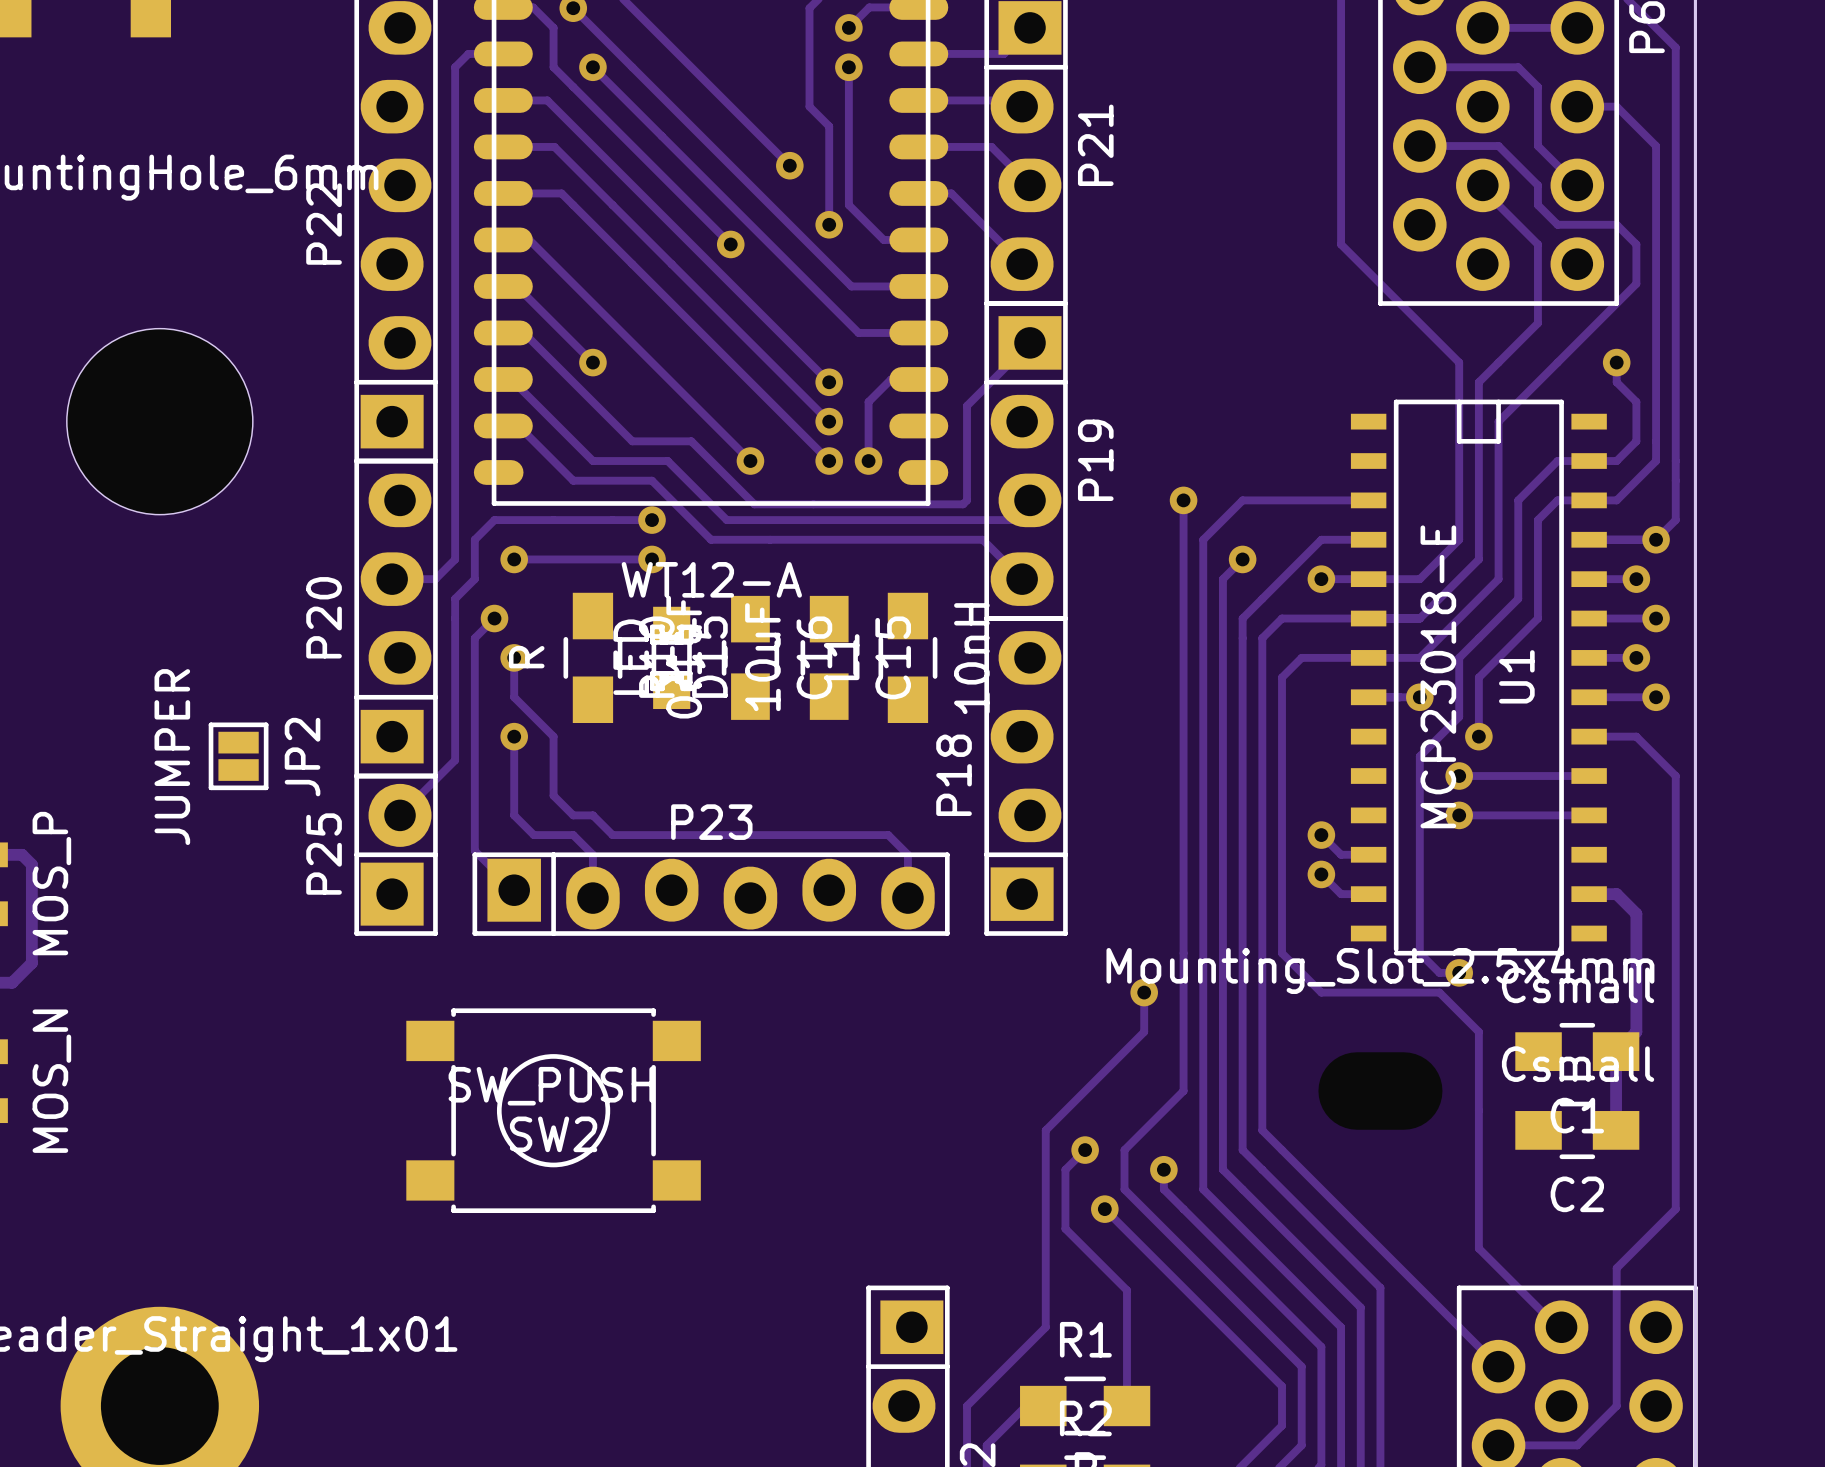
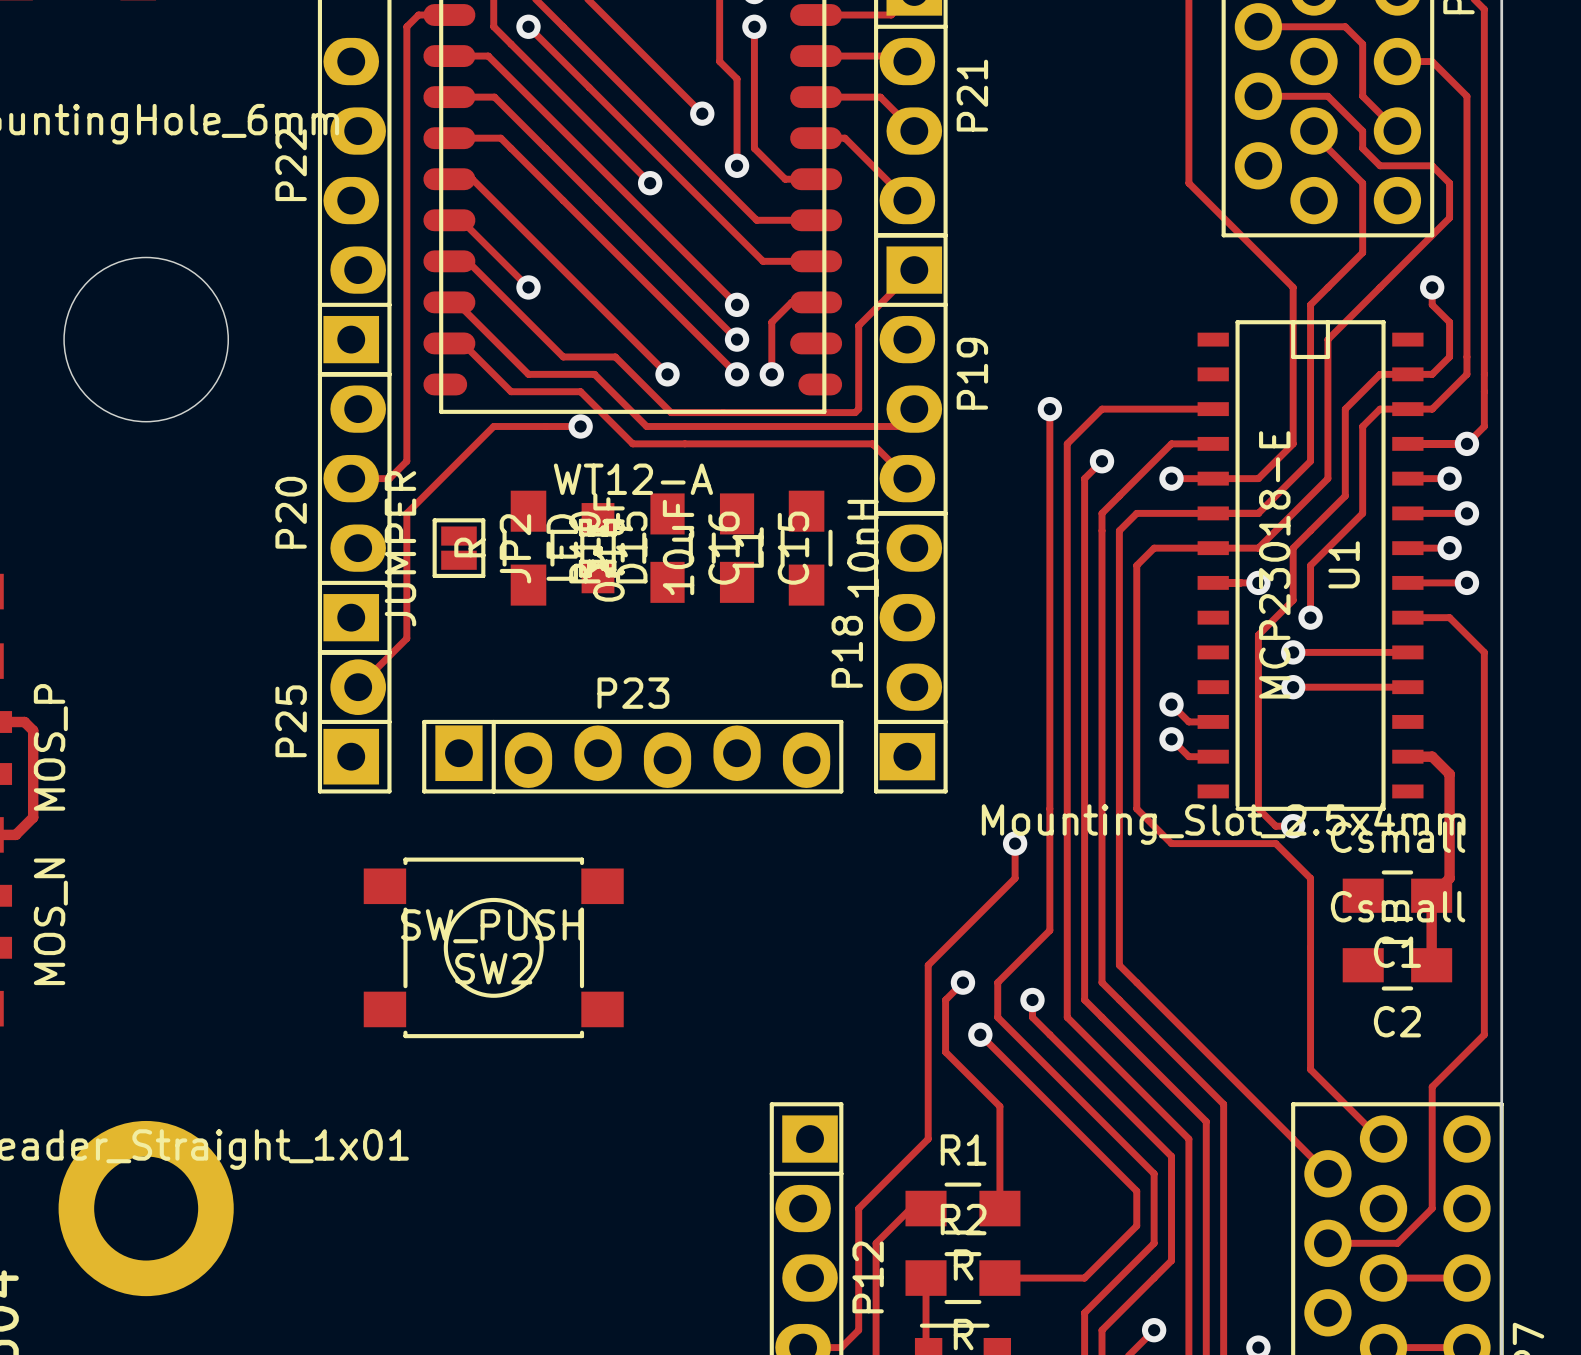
track: (553, 520) (494, 520) (474, 539) (474, 579) (455, 598) (455, 618) -> (493, 426) (406, 513)
track: (514, 559) (652, 559) -> none
via: (514, 559) -> none
via: (652, 559) -> none
track: (494, 618) (474, 638) (474, 850) (514, 890) -> none
via: (494, 618) -> none
track: (514, 657) (514, 697) (553, 736) (553, 795) (573, 815) (592, 815) (612, 835) (888, 835) (907, 854) (907, 898) -> none
via: (514, 657) -> none
track: (514, 736) (514, 815) (533, 835) (573, 835) (592, 854) (592, 898) -> none
via: (514, 736) -> none
JP2 position: (238, 756) -> (458, 548)

